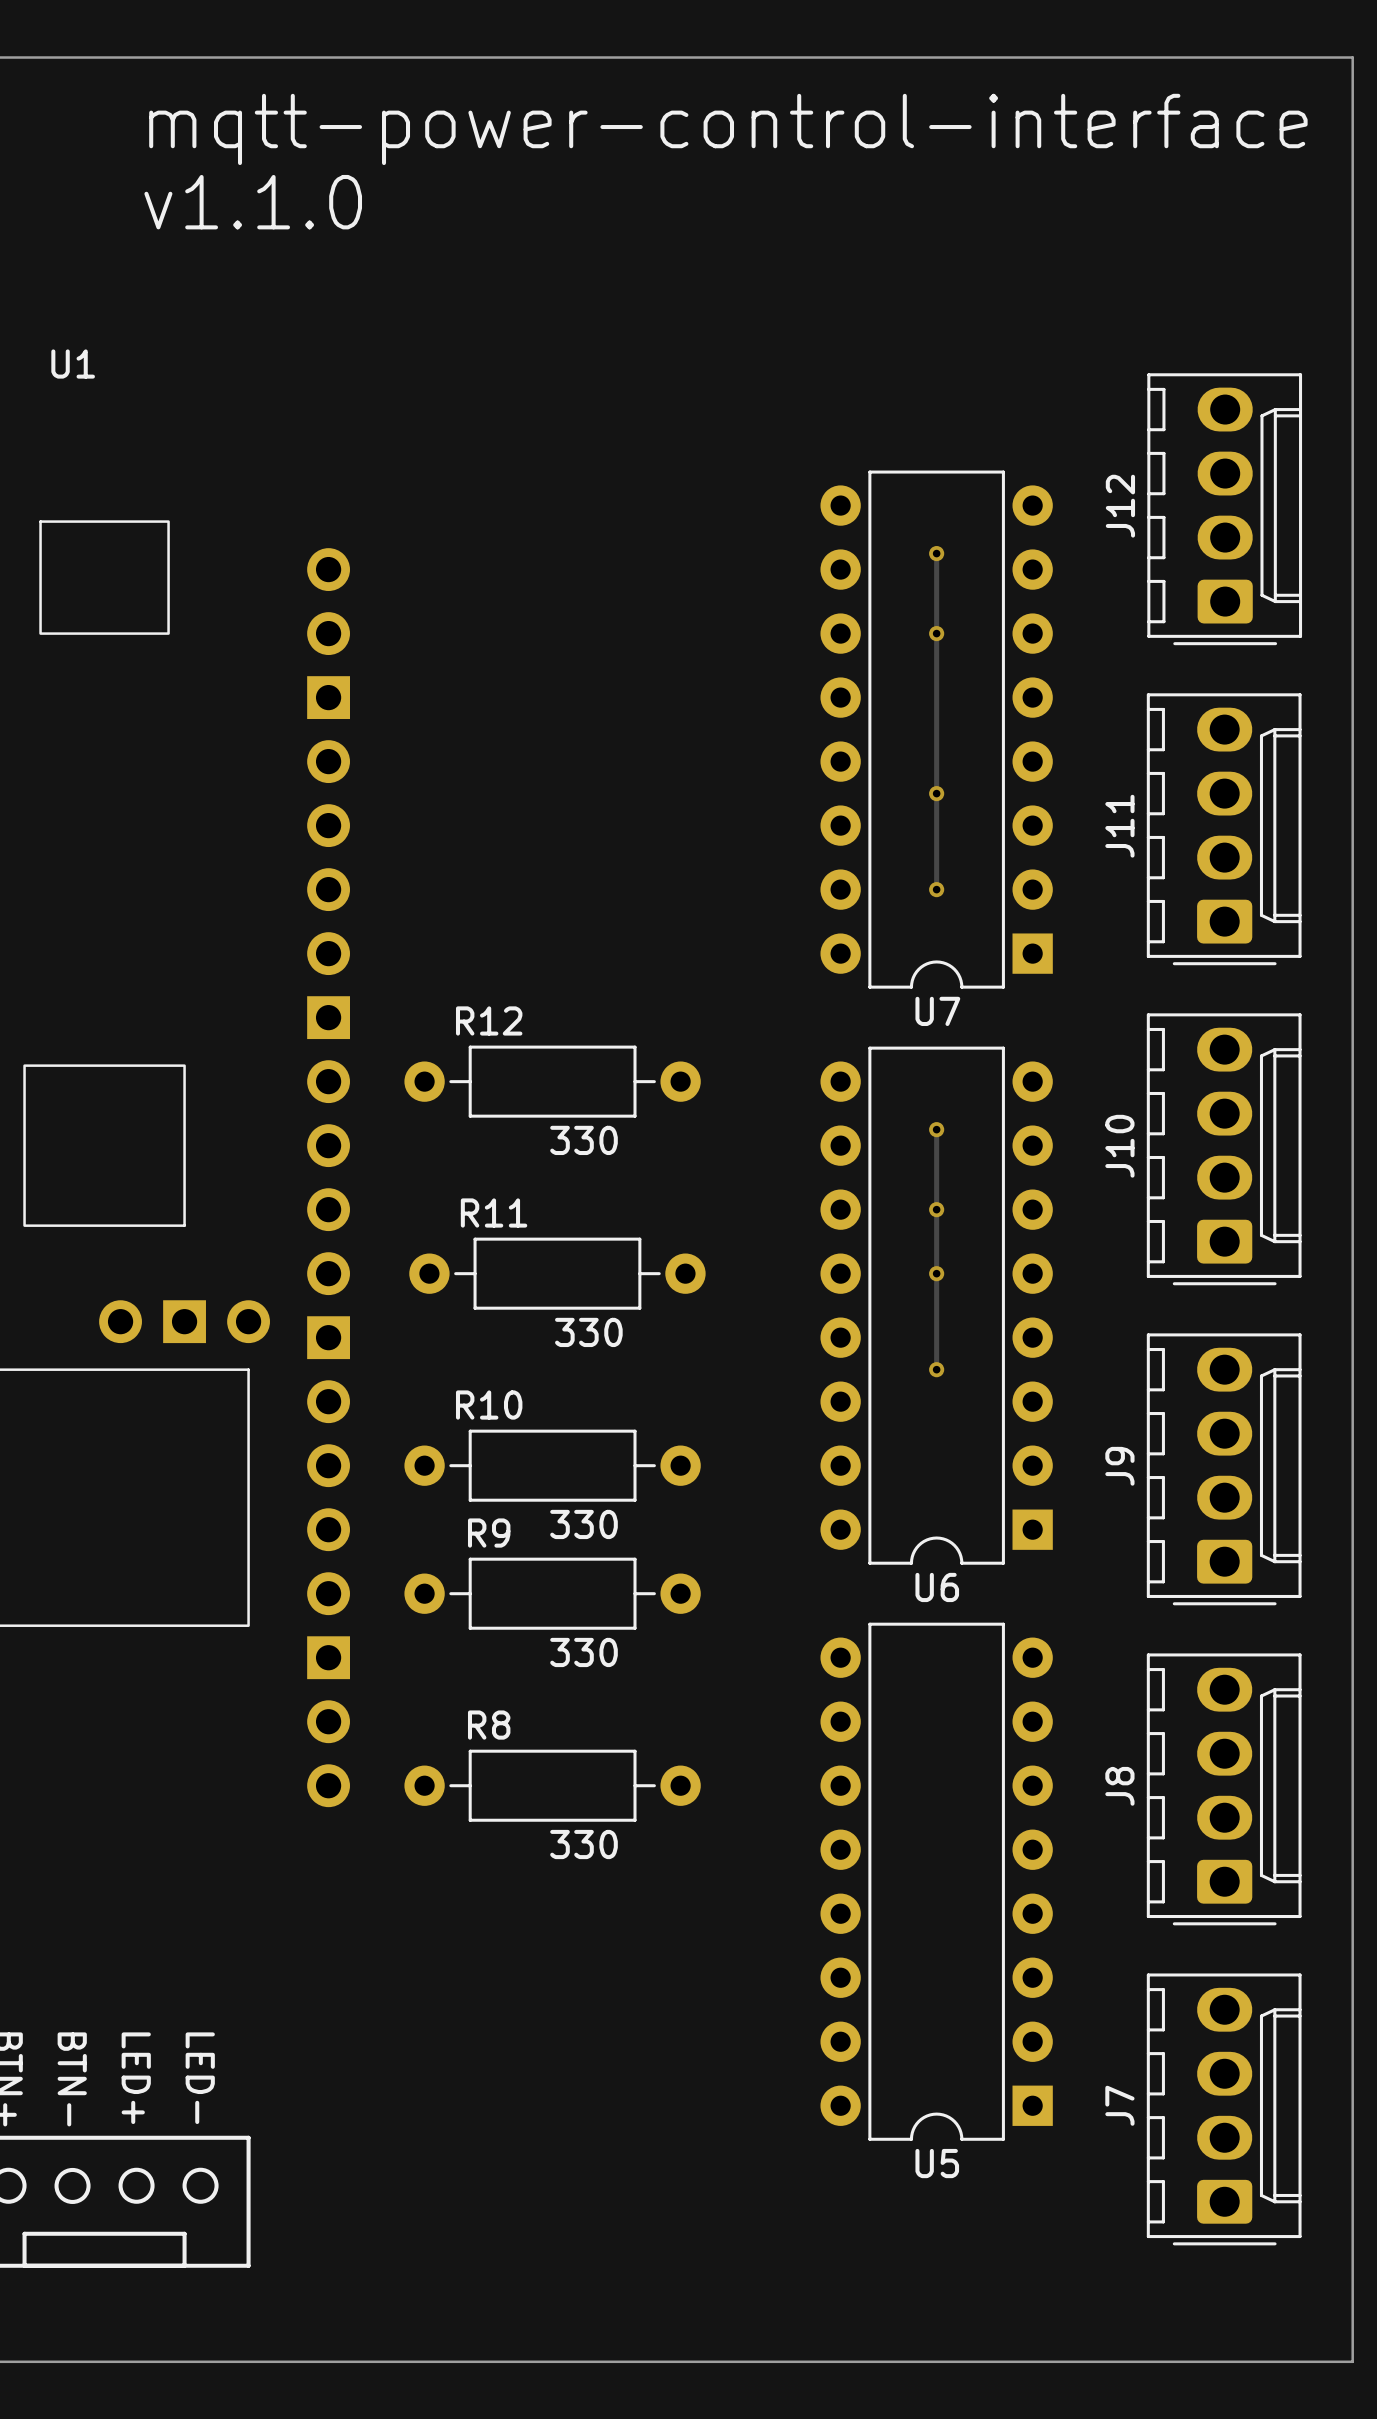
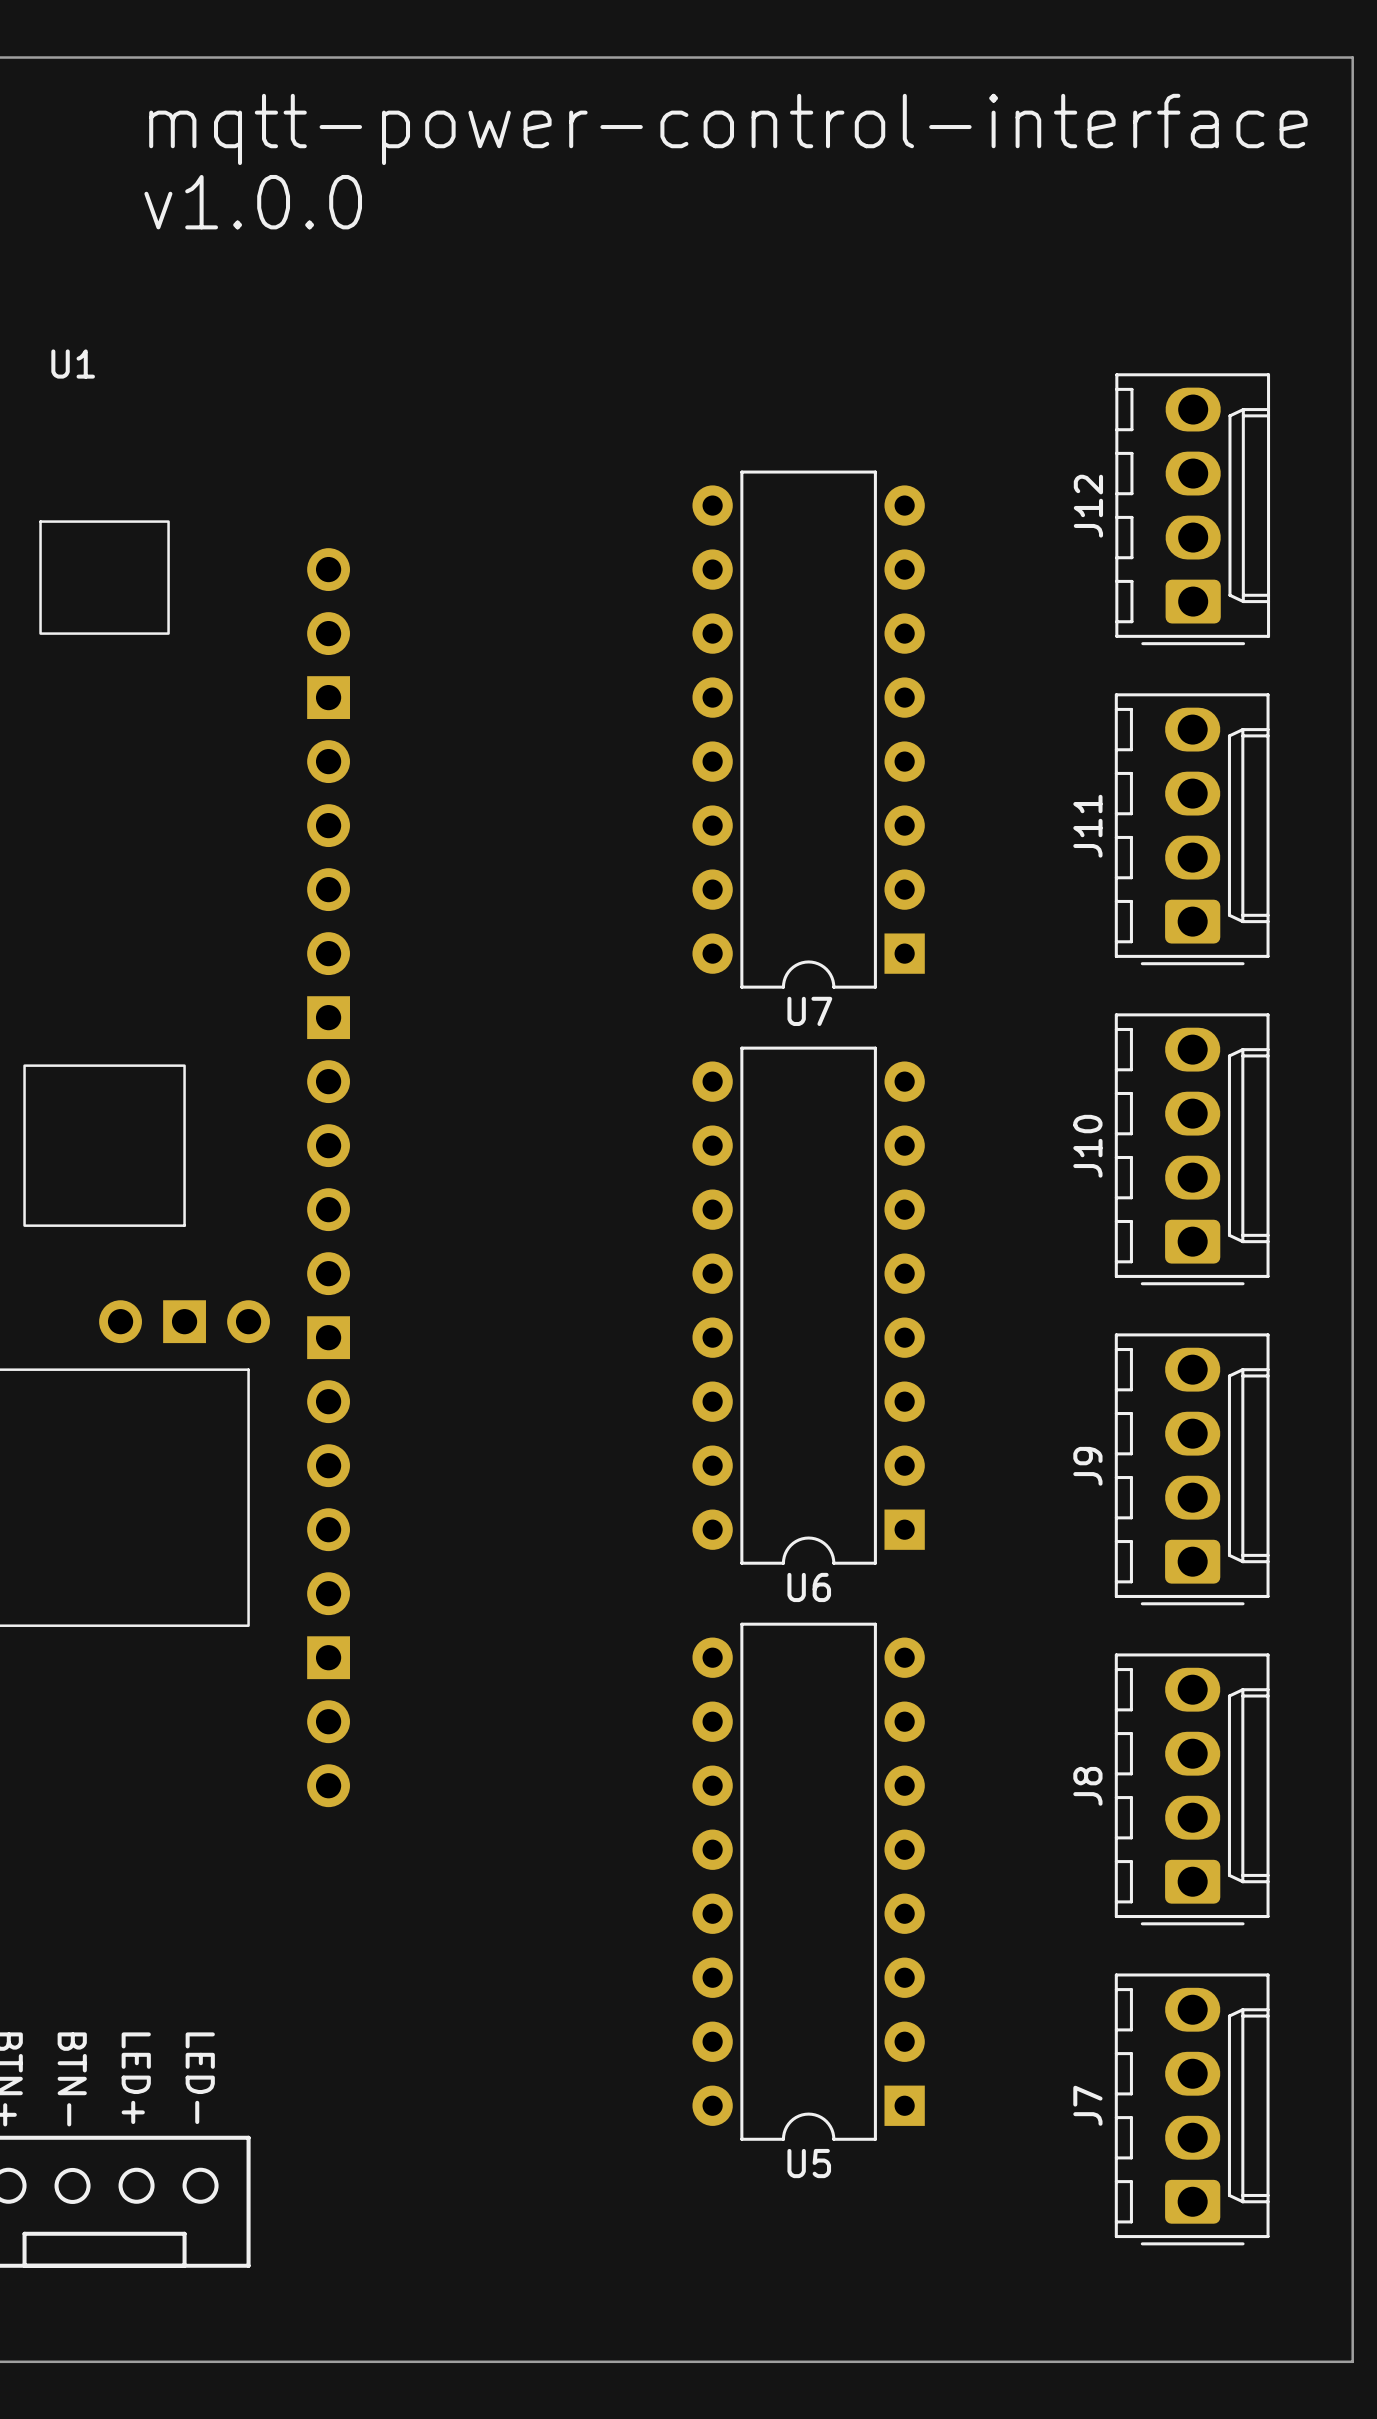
text: v1.1.0 (253, 202) -> v1.0.0 (253, 202)
J12 position: (1224, 509) -> (1192, 509)
track: (936, 553) (936, 889) -> none
via: (936, 553) -> none
via: (936, 633) -> none
U7 position: (936, 729) -> (808, 729)
via: (936, 793) -> none
J11 position: (1224, 829) -> (1192, 829)
via: (936, 889) -> none
R12: 330 (552, 1081) -> none
track: (936, 1129) (936, 1369) -> none
via: (936, 1129) -> none
J10 position: (1224, 1149) -> (1192, 1149)
via: (936, 1209) -> none
R11: 330 (557, 1273) -> none
via: (936, 1273) -> none
U6 position: (936, 1305) -> (808, 1305)
via: (936, 1369) -> none
R10: 330 (552, 1465) -> none
J9 position: (1224, 1469) -> (1192, 1469)
R9: 330 (552, 1593) -> none
R8: 330 (552, 1785) -> none
J8 position: (1224, 1789) -> (1192, 1789)
U5 position: (936, 1881) -> (808, 1881)
J7 position: (1224, 2109) -> (1192, 2109)

